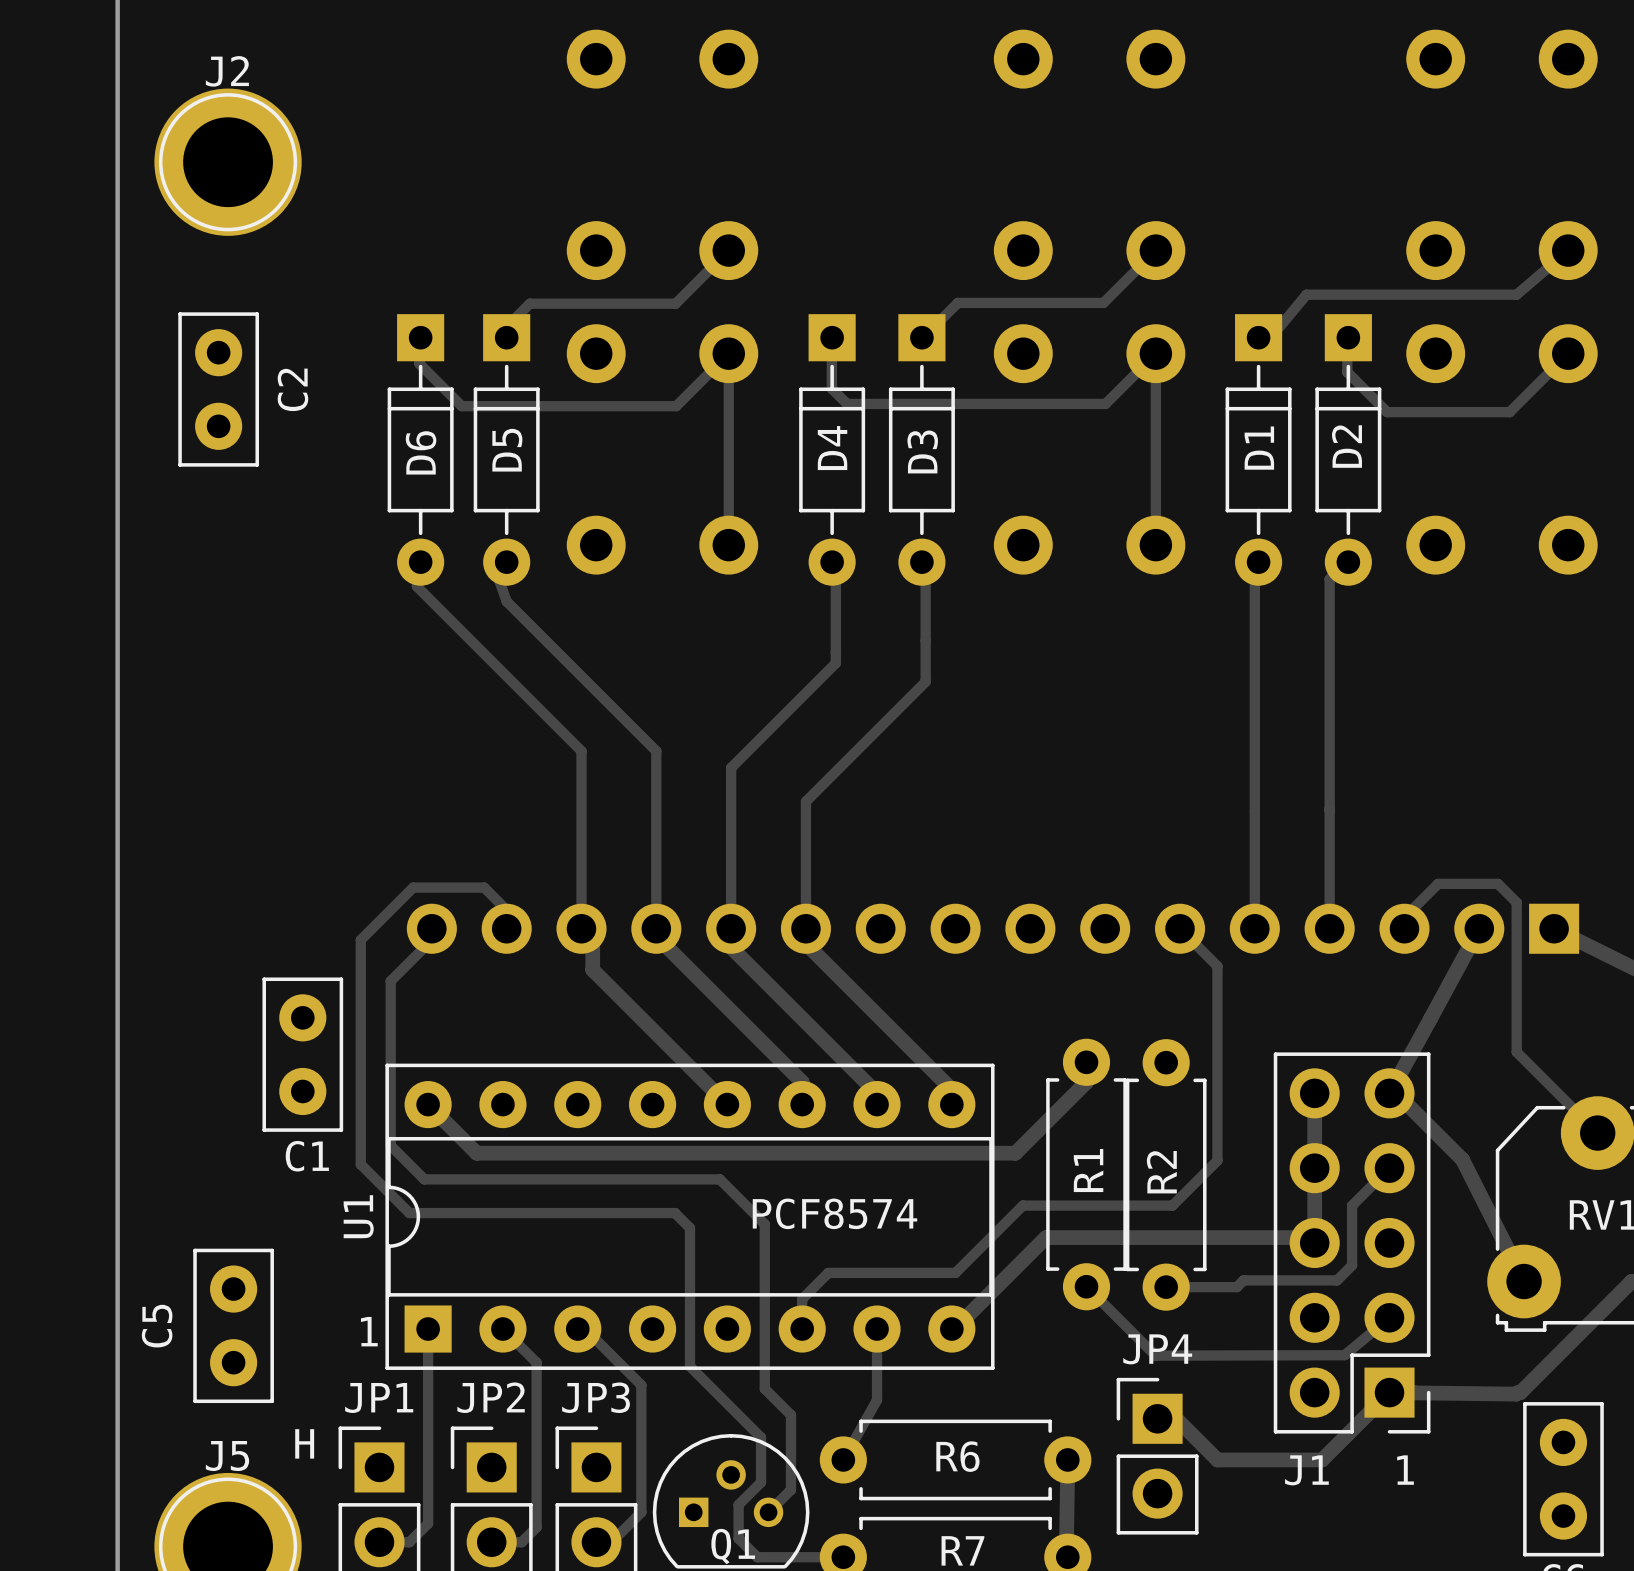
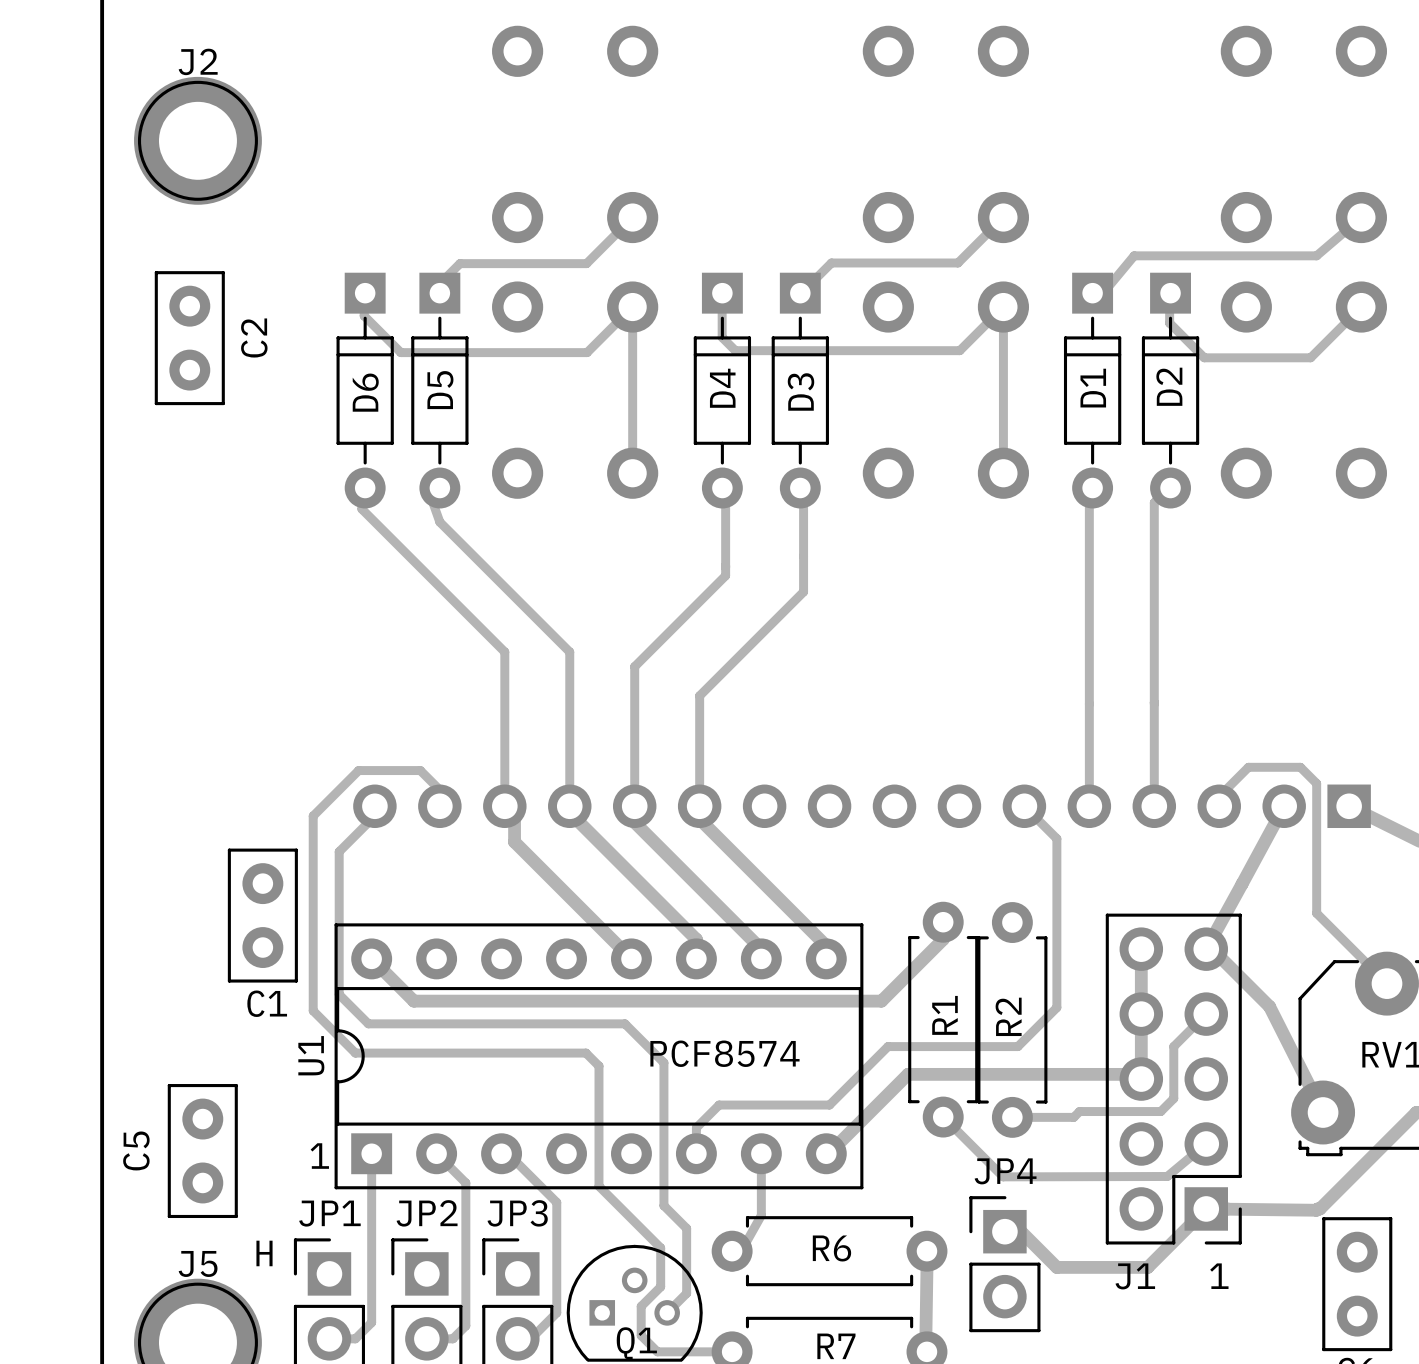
R6 position: (955, 1459) -> (829, 1251)

